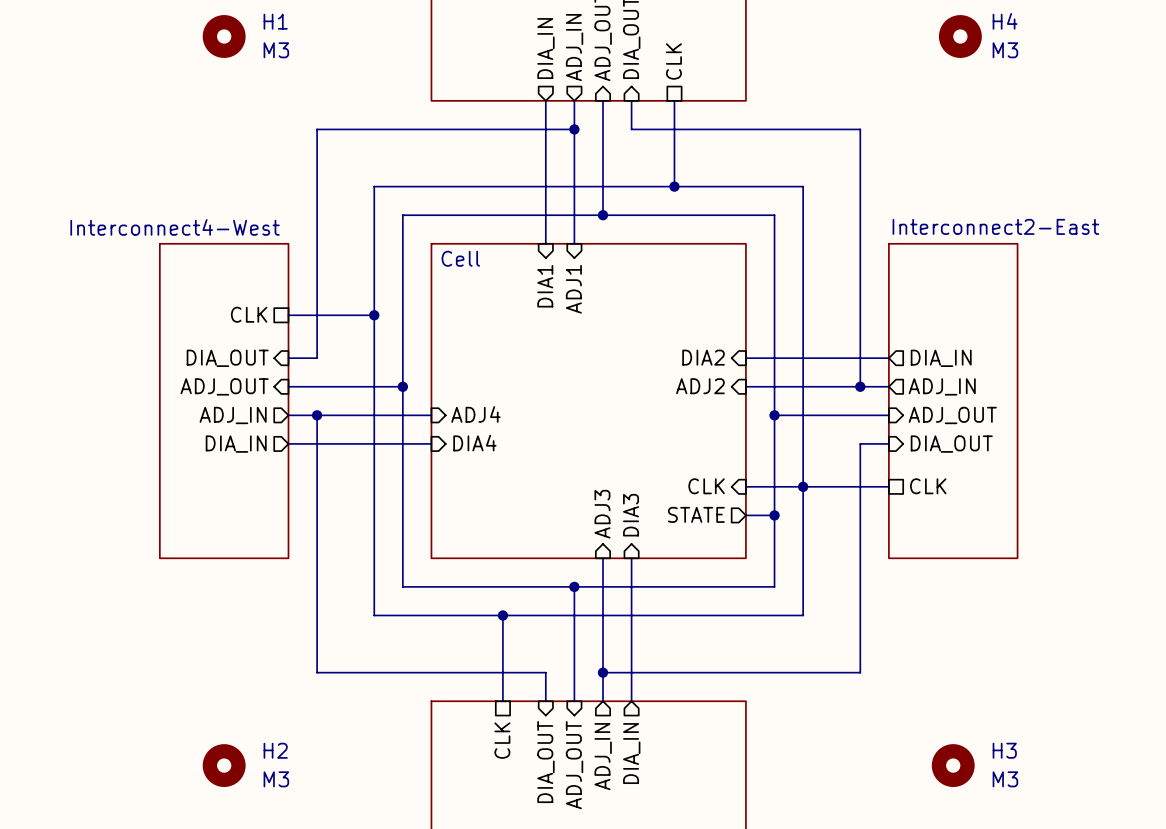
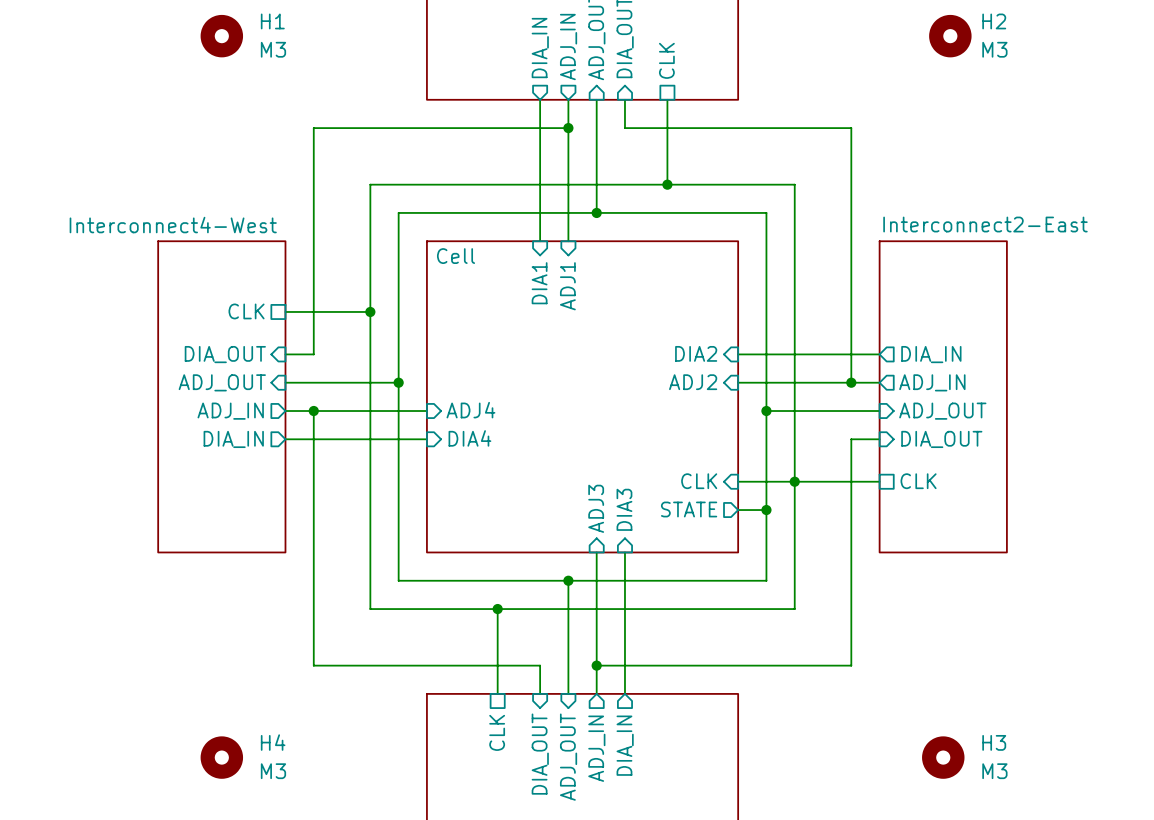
H4 name: H4 (1005, 21) -> H2 (994, 21)
H2 name: H2 (275, 750) -> H4 (273, 742)

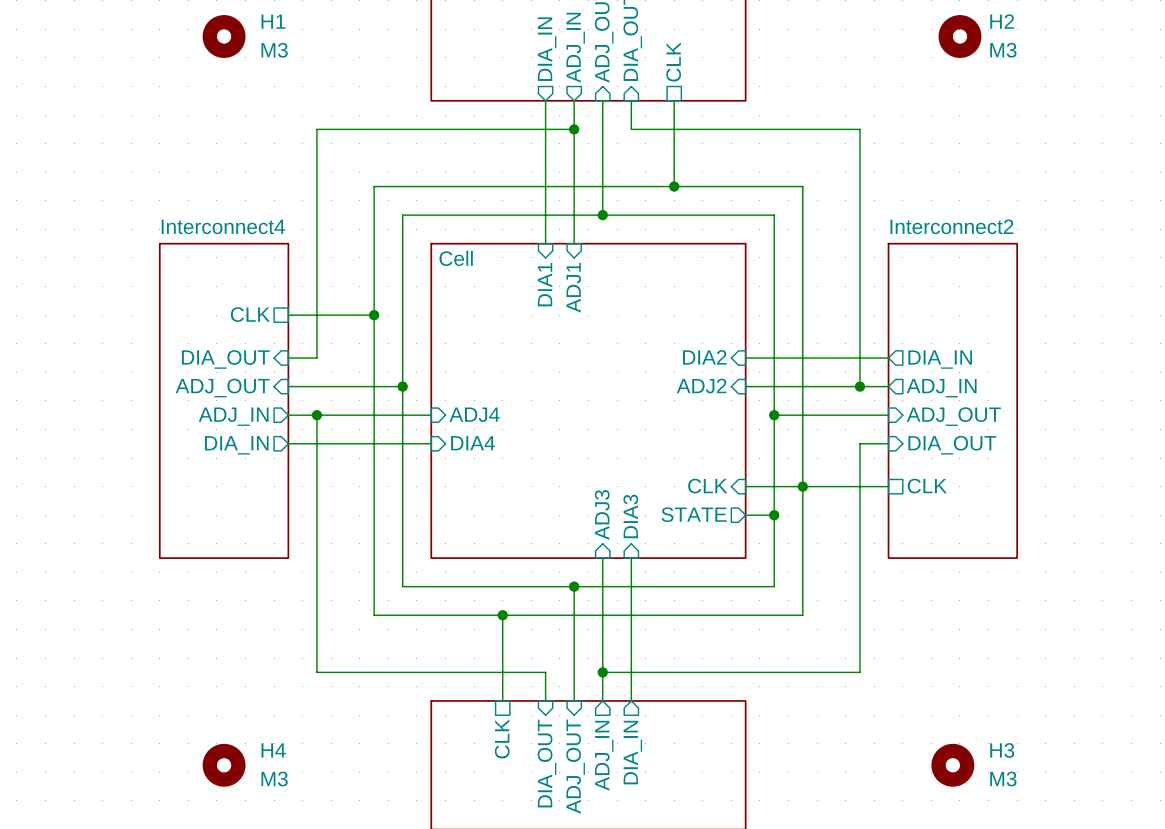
sheet Interconnect2-East name: Interconnect2-East (985, 224) -> Interconnect2 (951, 226)
sheet Interconnect4-West name: Interconnect4-West (173, 225) -> Interconnect4 (223, 226)

